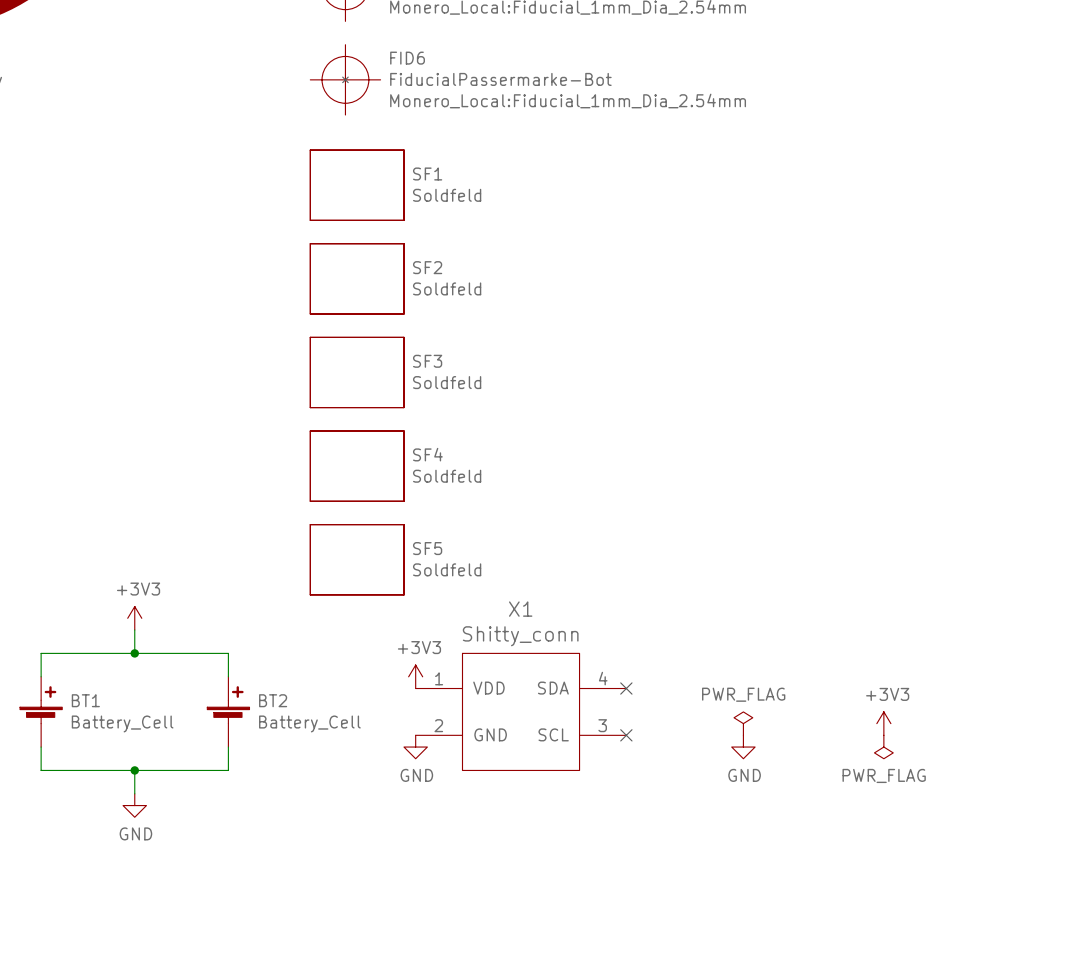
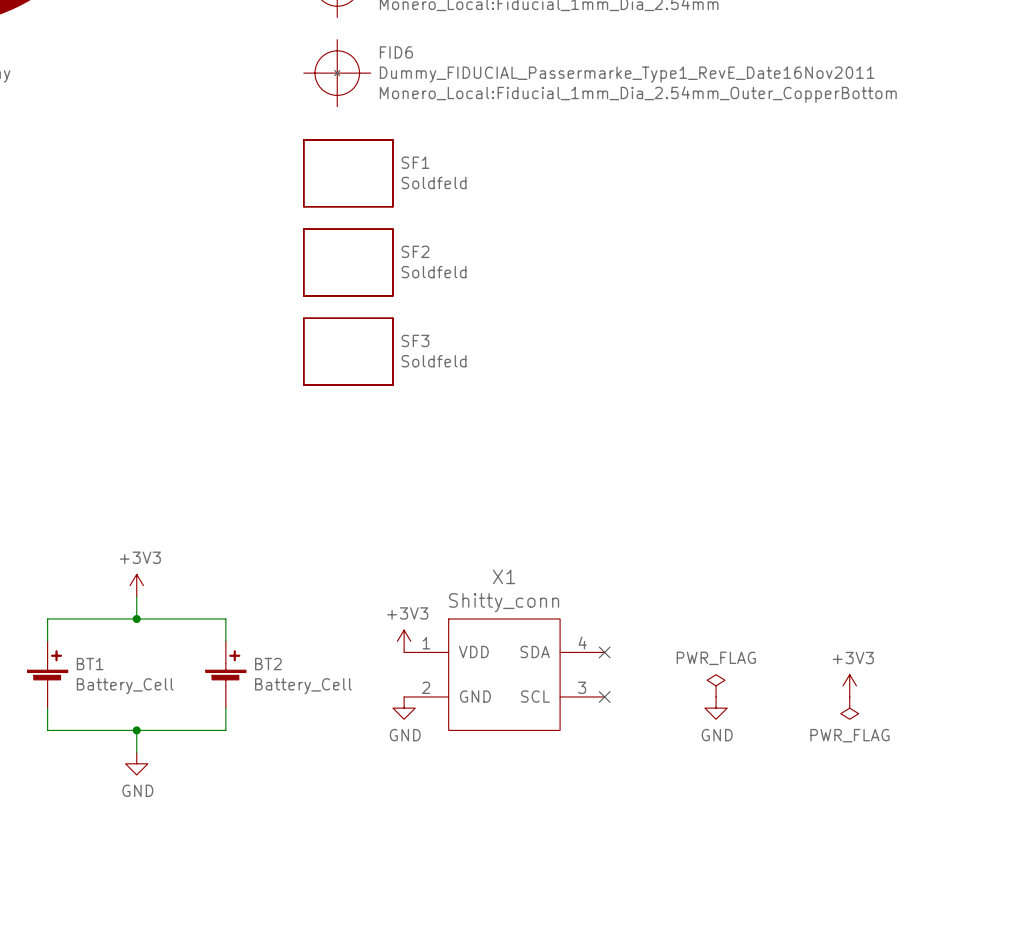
FID6 value: FiducialPassermarke-Bot (500, 79) -> Dummy_FIDUCIAL_Passermarke_Type1_RevE_Date16Nov2011 (627, 74)
FID6 text: Monero_Local:Fiducial_1mm_Dia_2.54mm (568, 101) -> Monero_Local:Fiducial_1mm_Dia_2.54mm_Outer_CopperBottom (638, 94)
SF4: Soldfeld (357, 466) -> none
SF5: Soldfeld (357, 559) -> none

